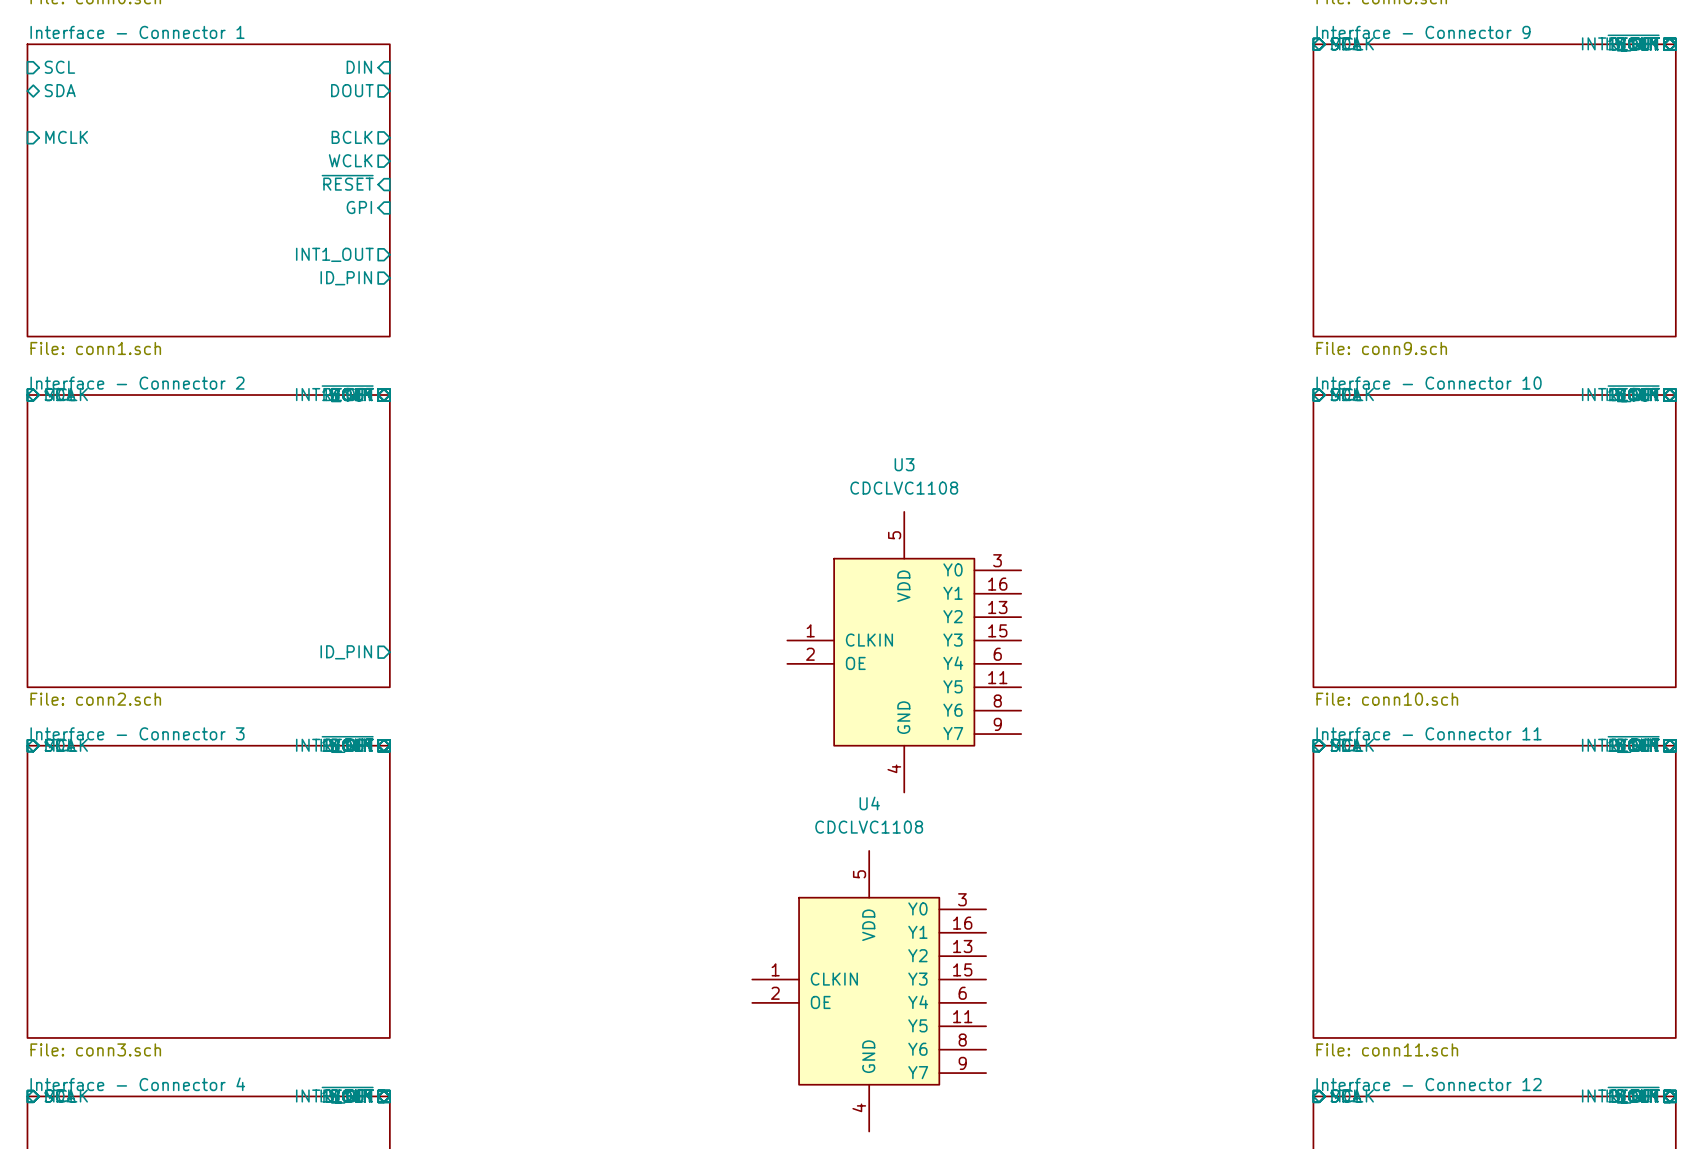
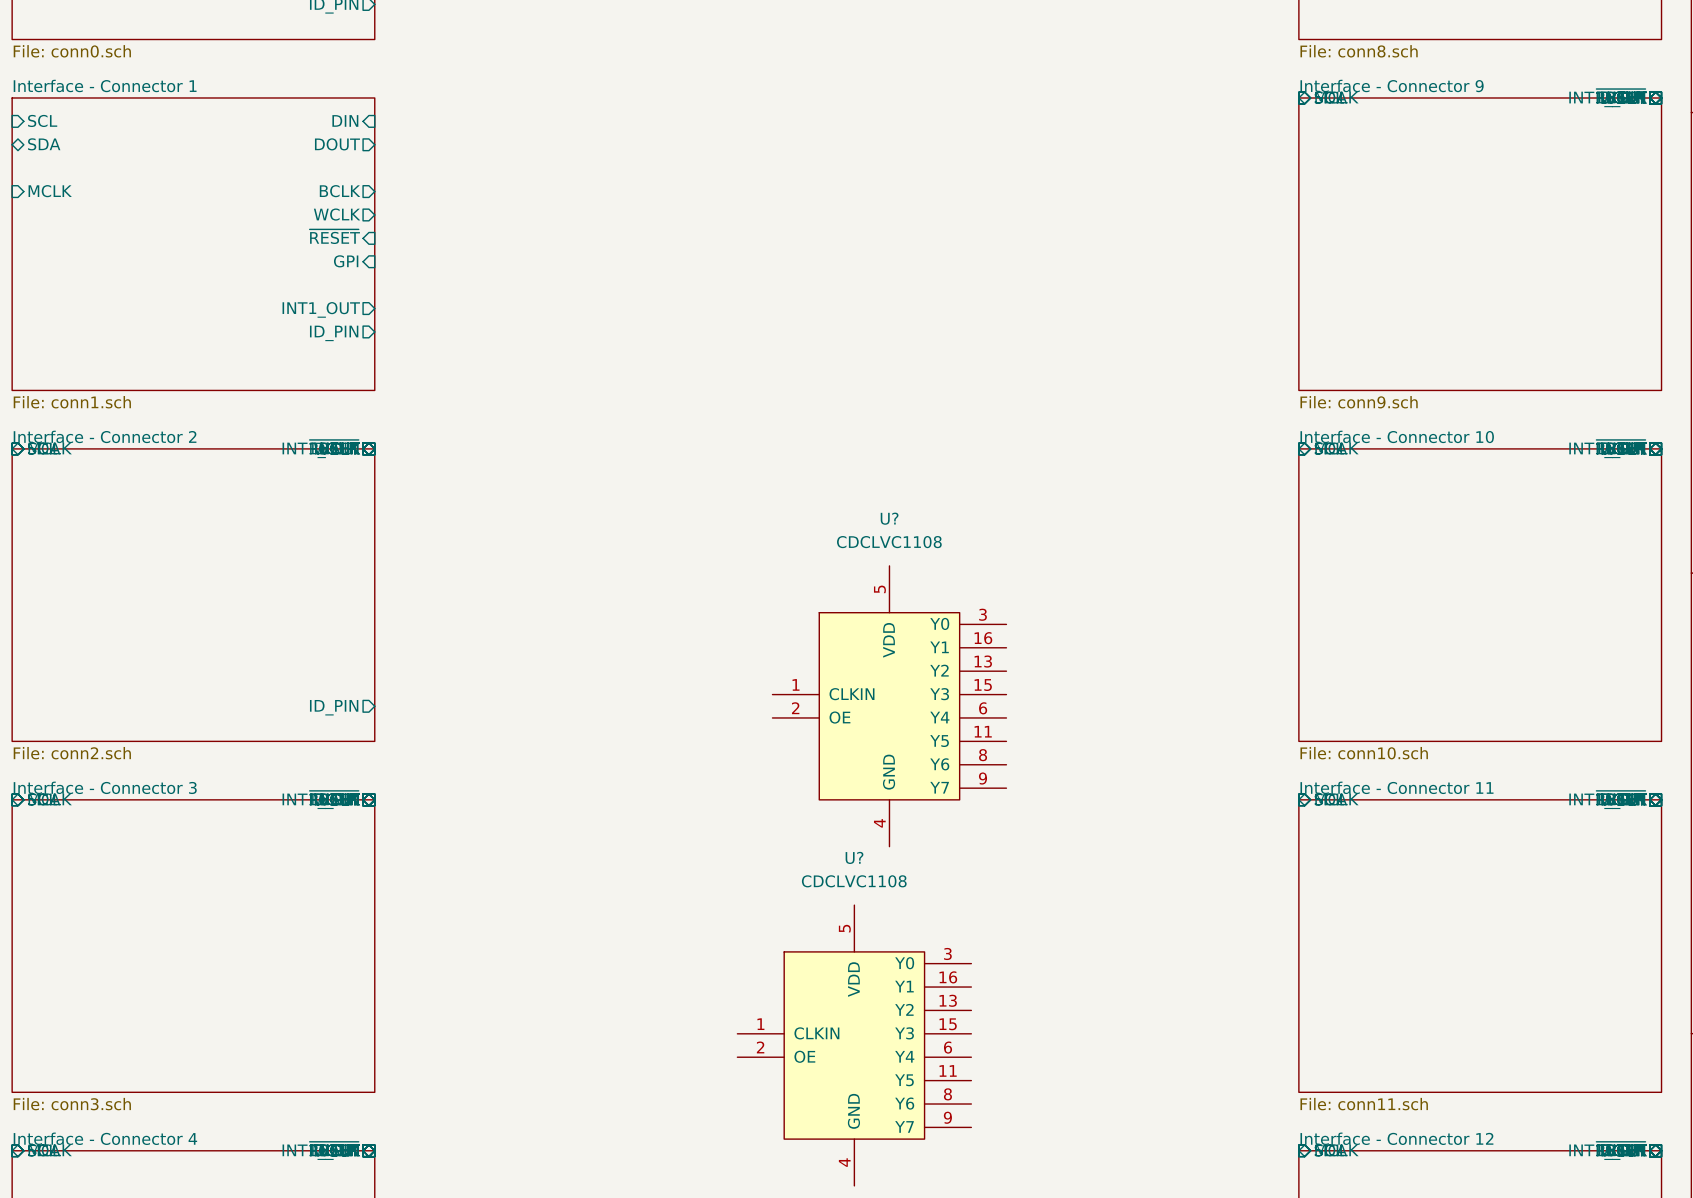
U3 name: U3 (904, 464) -> U? (889, 518)
U4 name: U4 (869, 803) -> U? (854, 857)

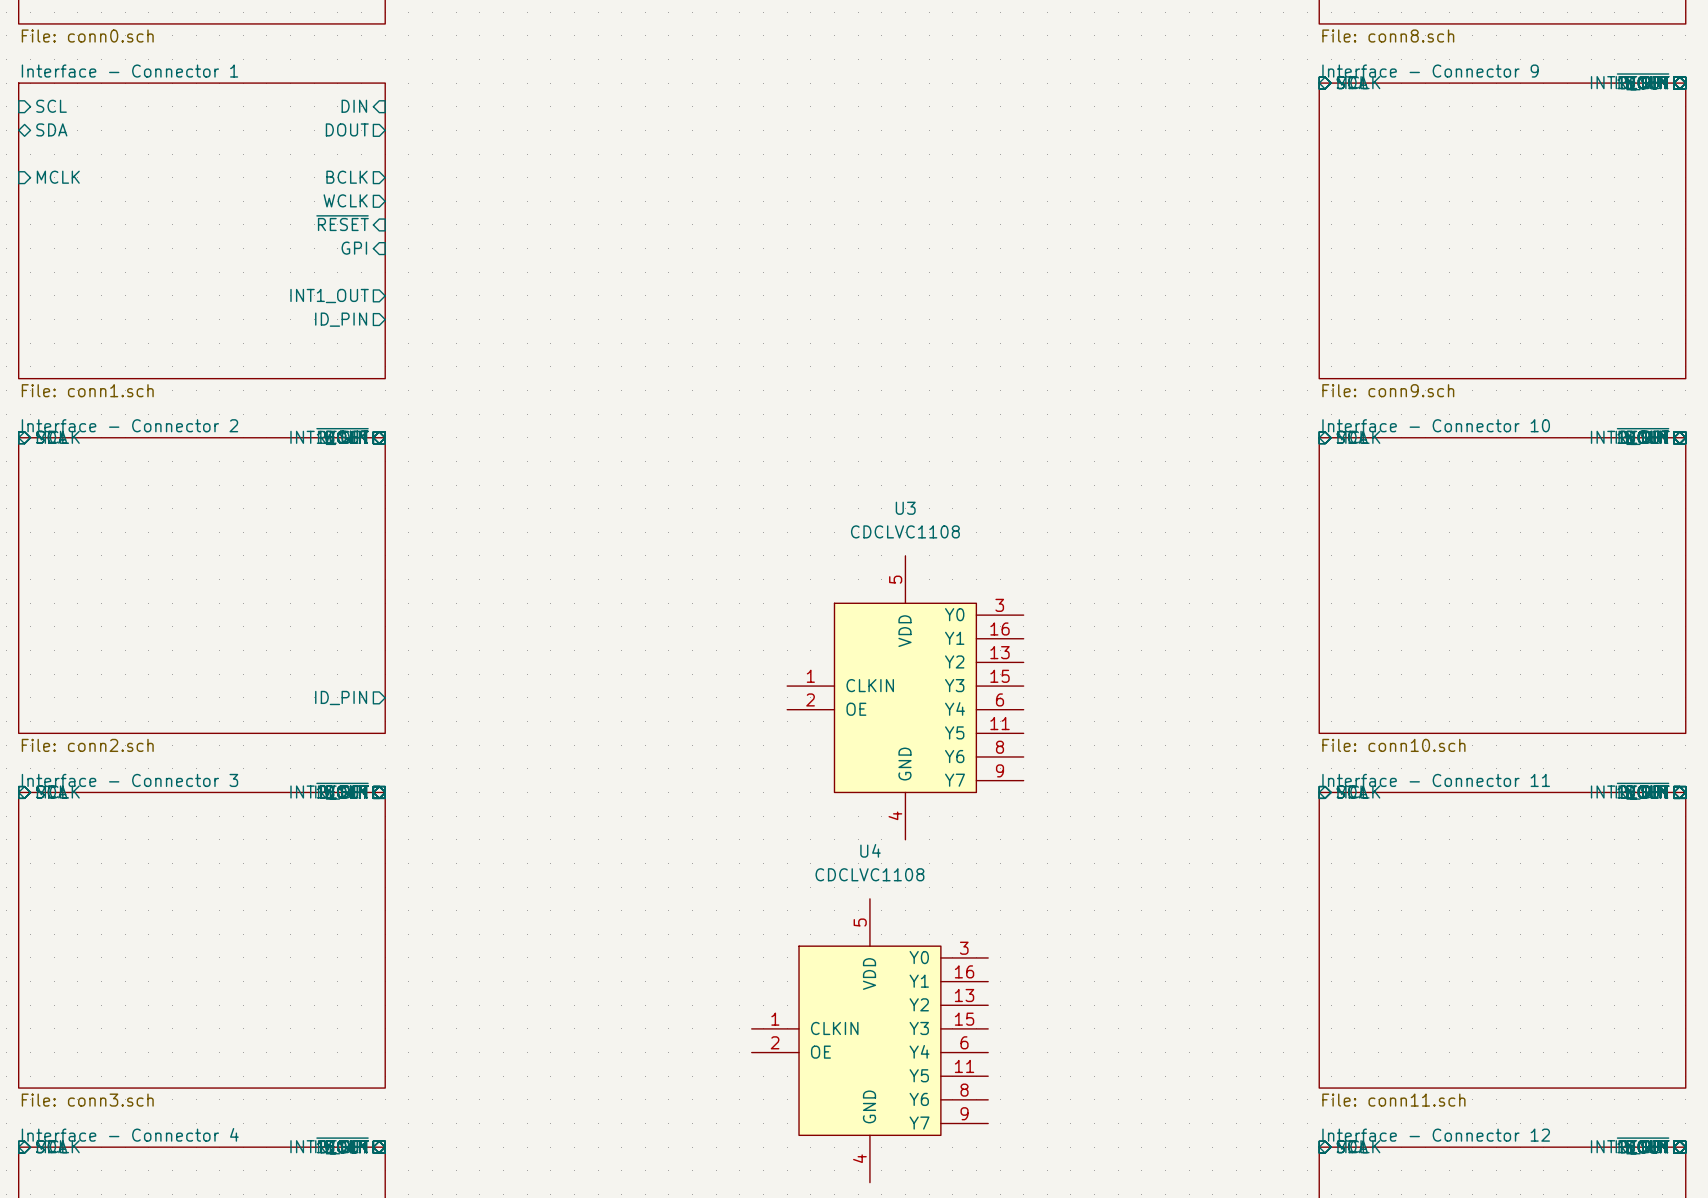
U? name: U? (889, 518) -> U3 (905, 508)
U? name: U? (854, 857) -> U4 (870, 850)

